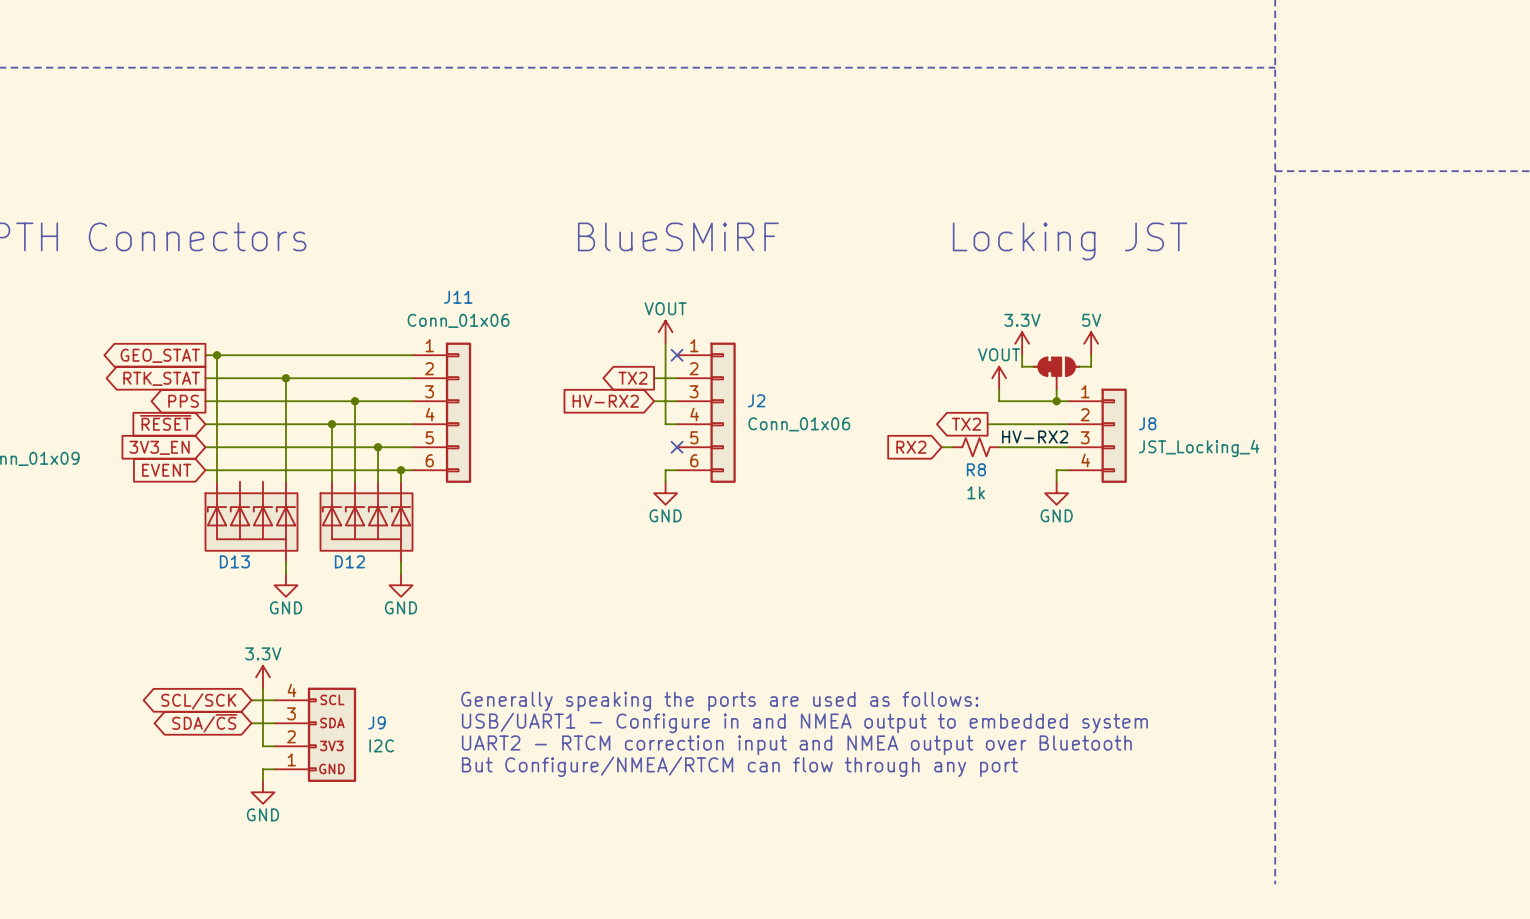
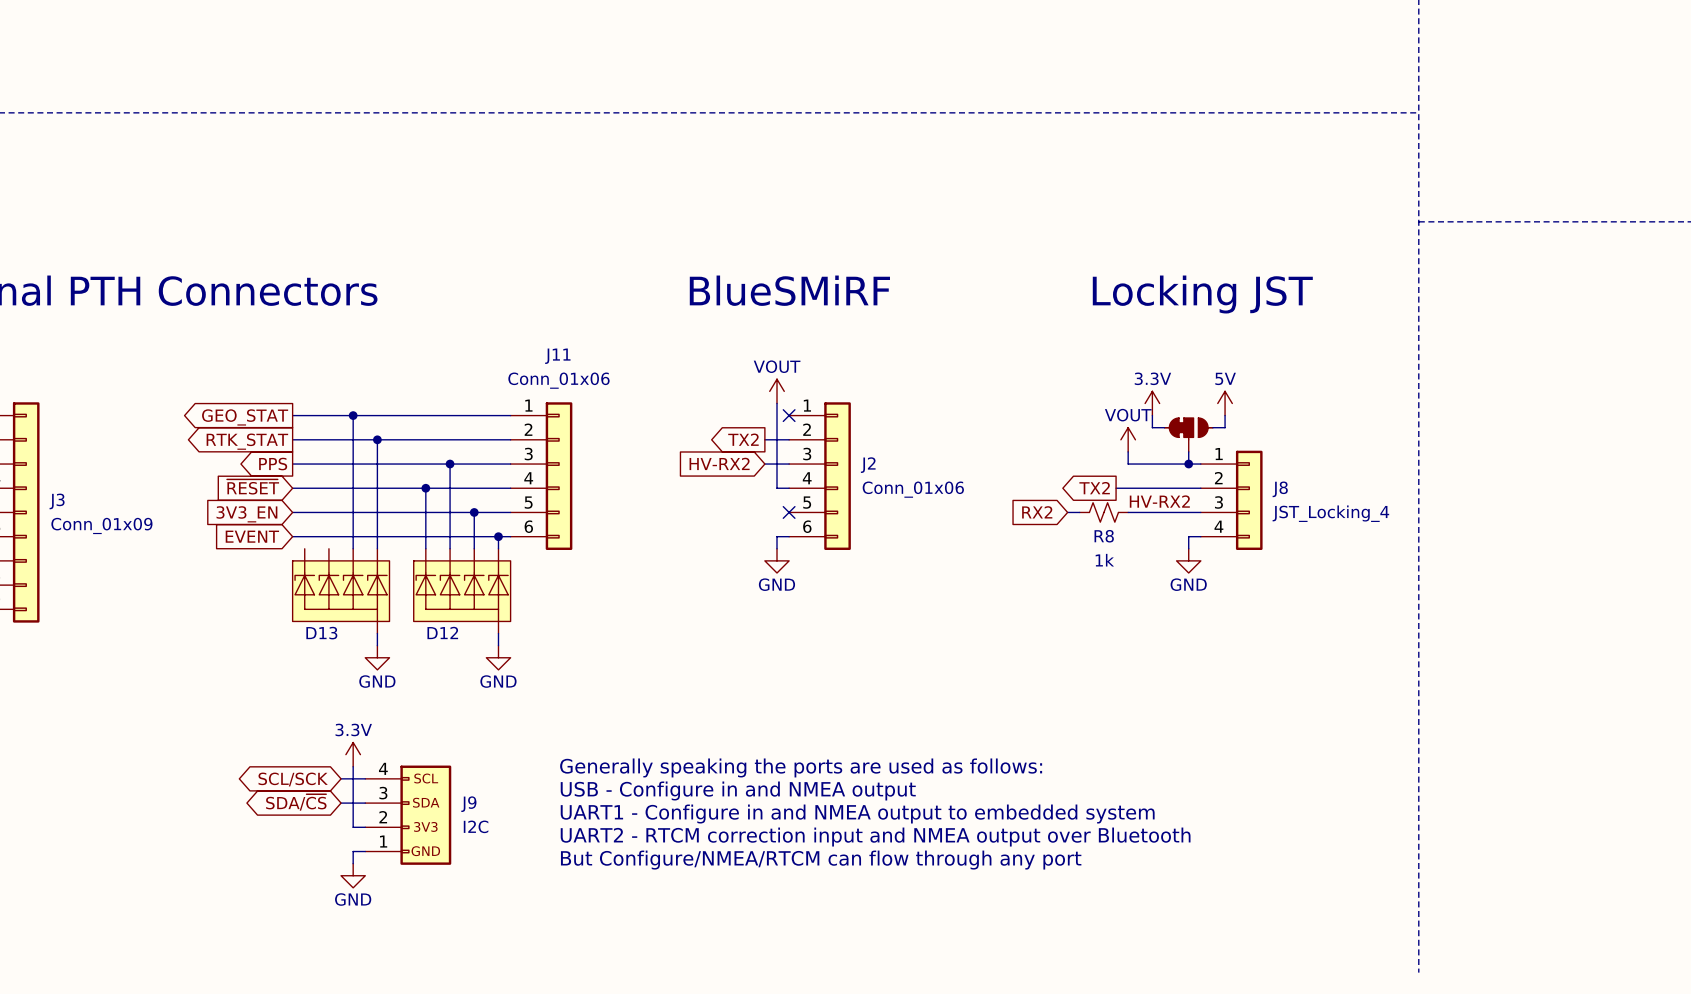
wire: (216, 355) (216, 481) -> (353, 415) (353, 548)
junction position: (216, 355) -> (353, 415)
text position: Generally speaking the ports are used as follows: (719, 701) -> Generally speaking the ports are used as follows: (801, 767)
text: none -> USB - Configure in and NMEA output (738, 790)
text: USB/UART1 - Configure in and NMEA output to embedded system (804, 723) -> none
text: none -> UART1 - Configure in and NMEA output to embedded system (857, 814)
text position: UART2 - RTCM correction input and NMEA output over Bluetooth (796, 745) -> UART2 - RTCM correction input and NMEA output over Bluetooth (875, 837)
text position: But Configure/NMEA/RTCM can flow through any port (739, 766) -> But Configure/NMEA/RTCM can flow through any port (821, 860)

